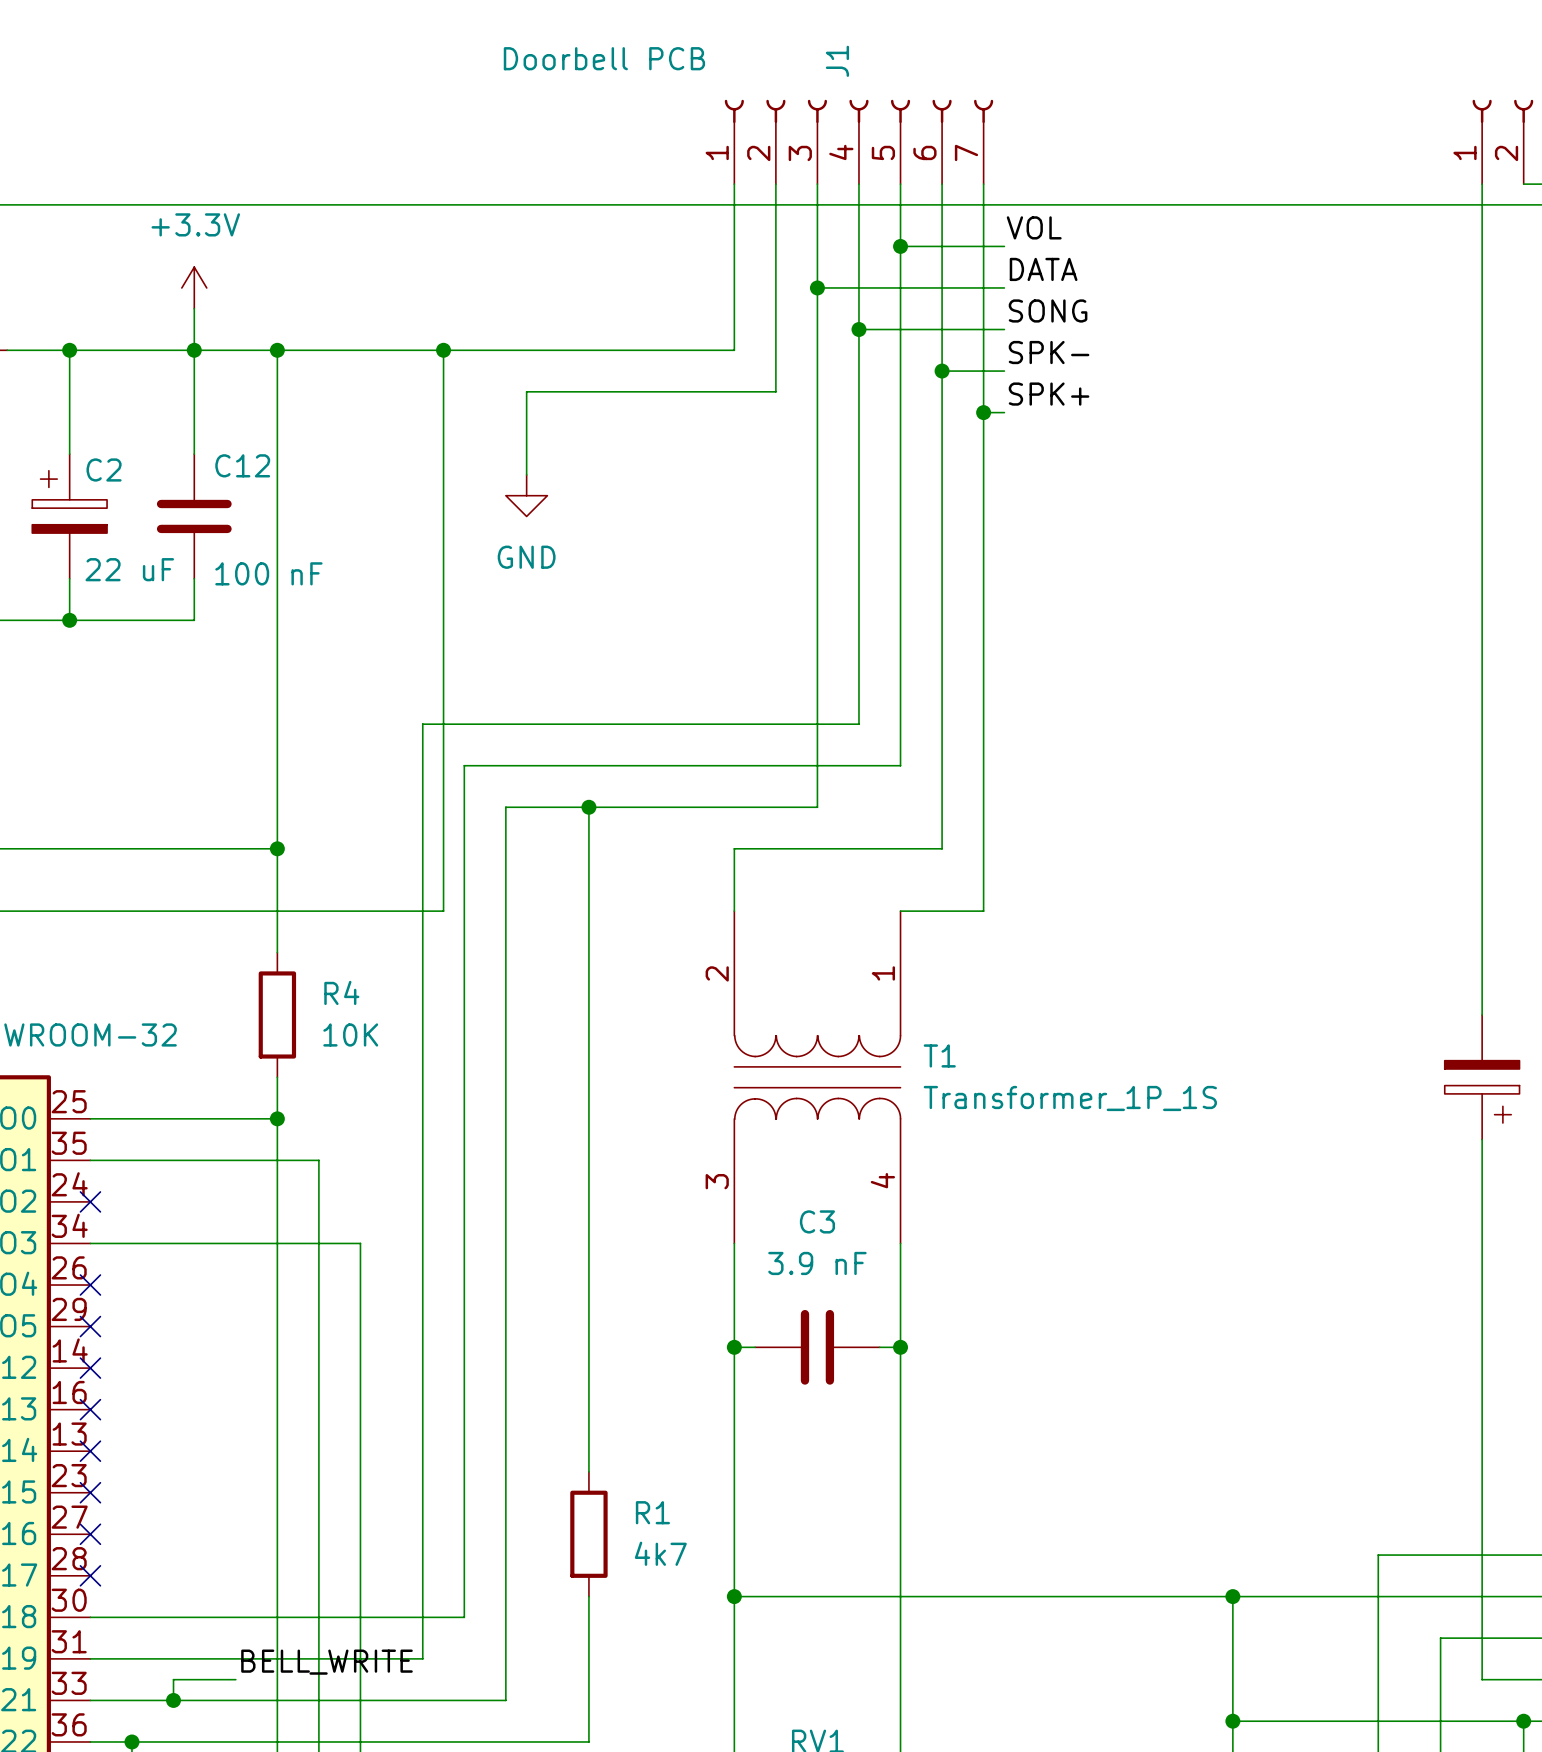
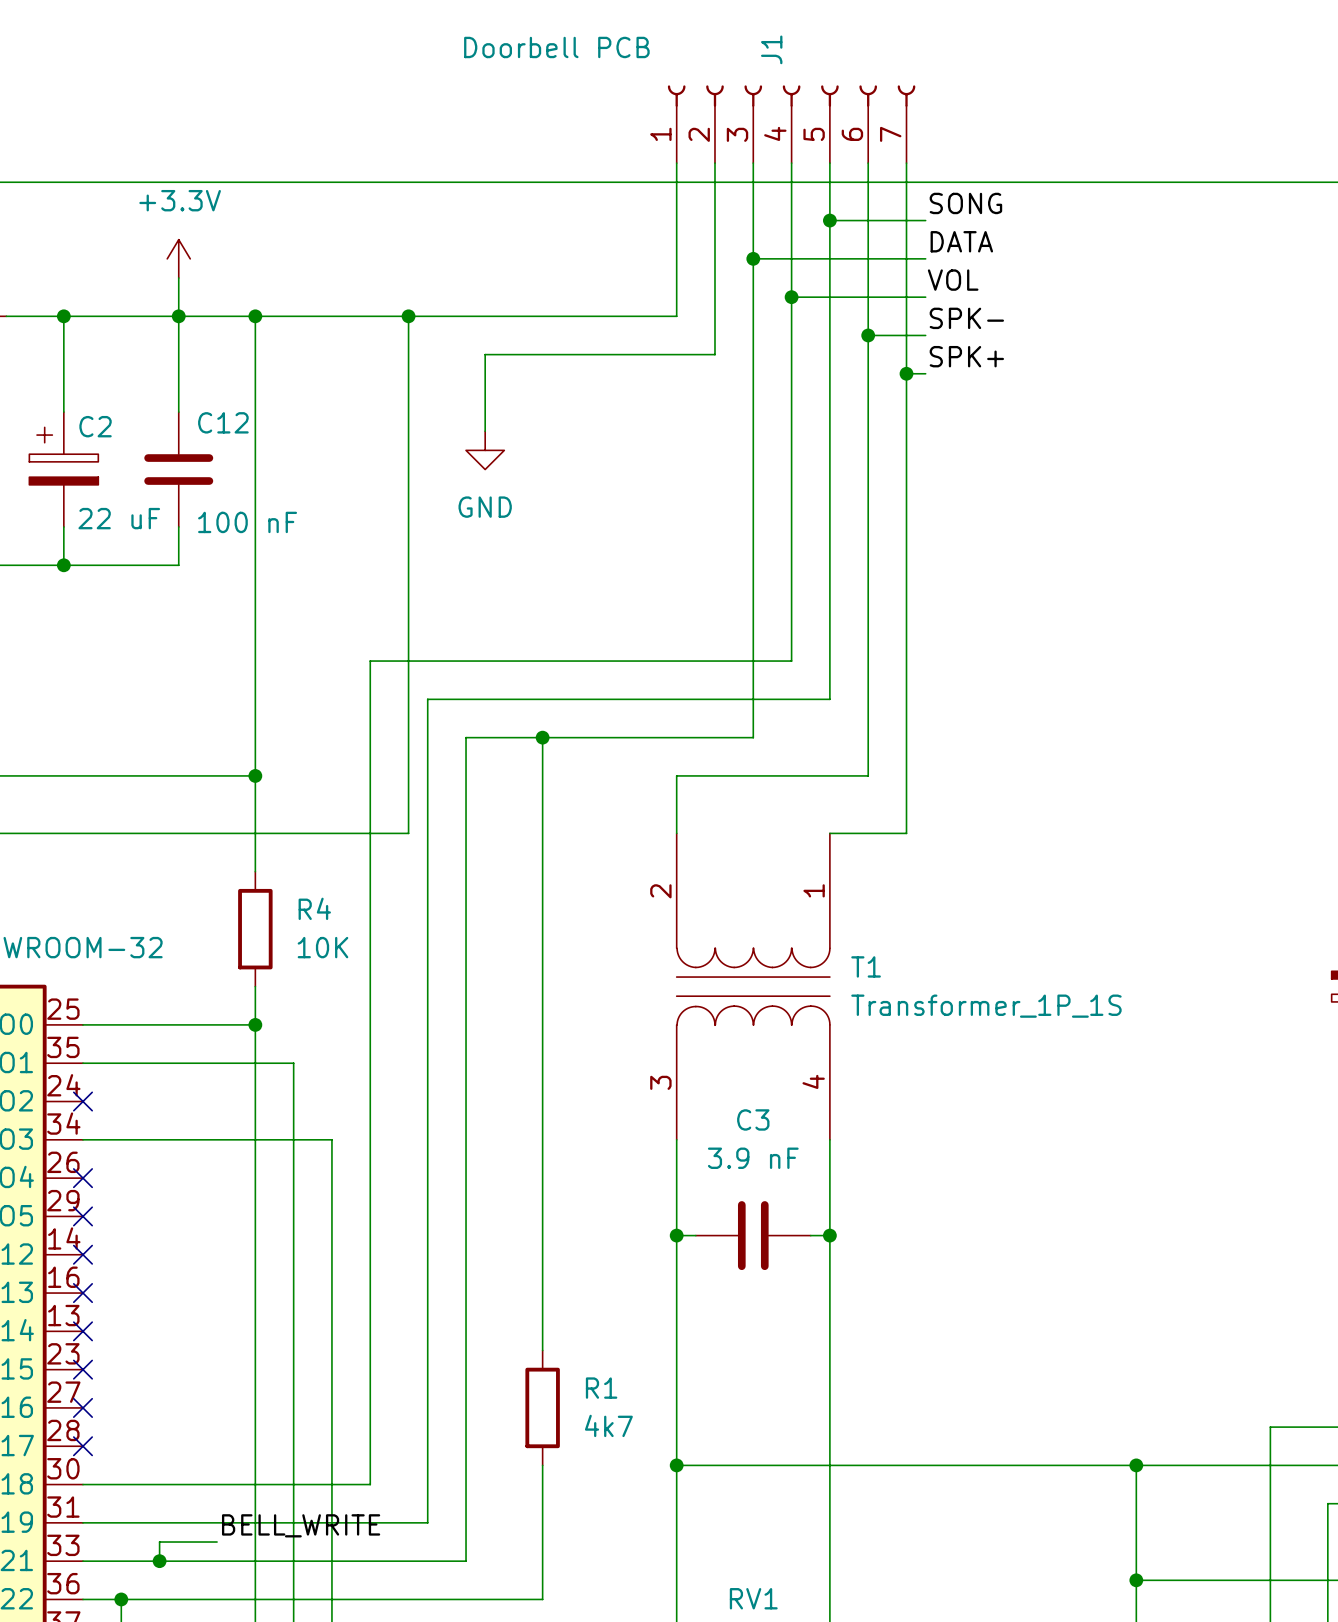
label: VOL (1034, 227) -> SONG (965, 203)
label: SONG (1048, 310) -> VOL (953, 280)
wire: (422, 724) (422, 1658) -> (389, 661) (370, 661) (370, 1484)
wire: (402, 1617) (464, 1617) -> (389, 1522) (427, 1522) (427, 1484)

